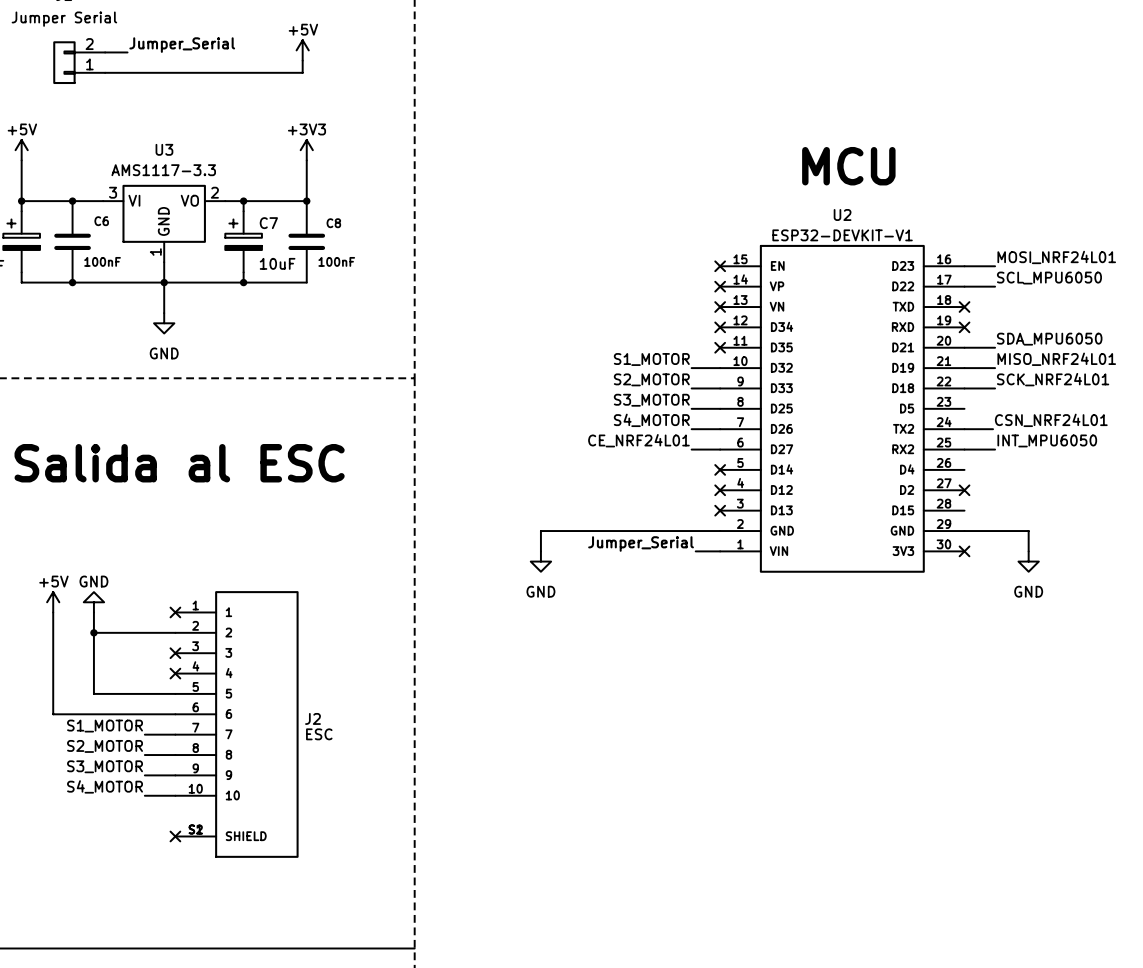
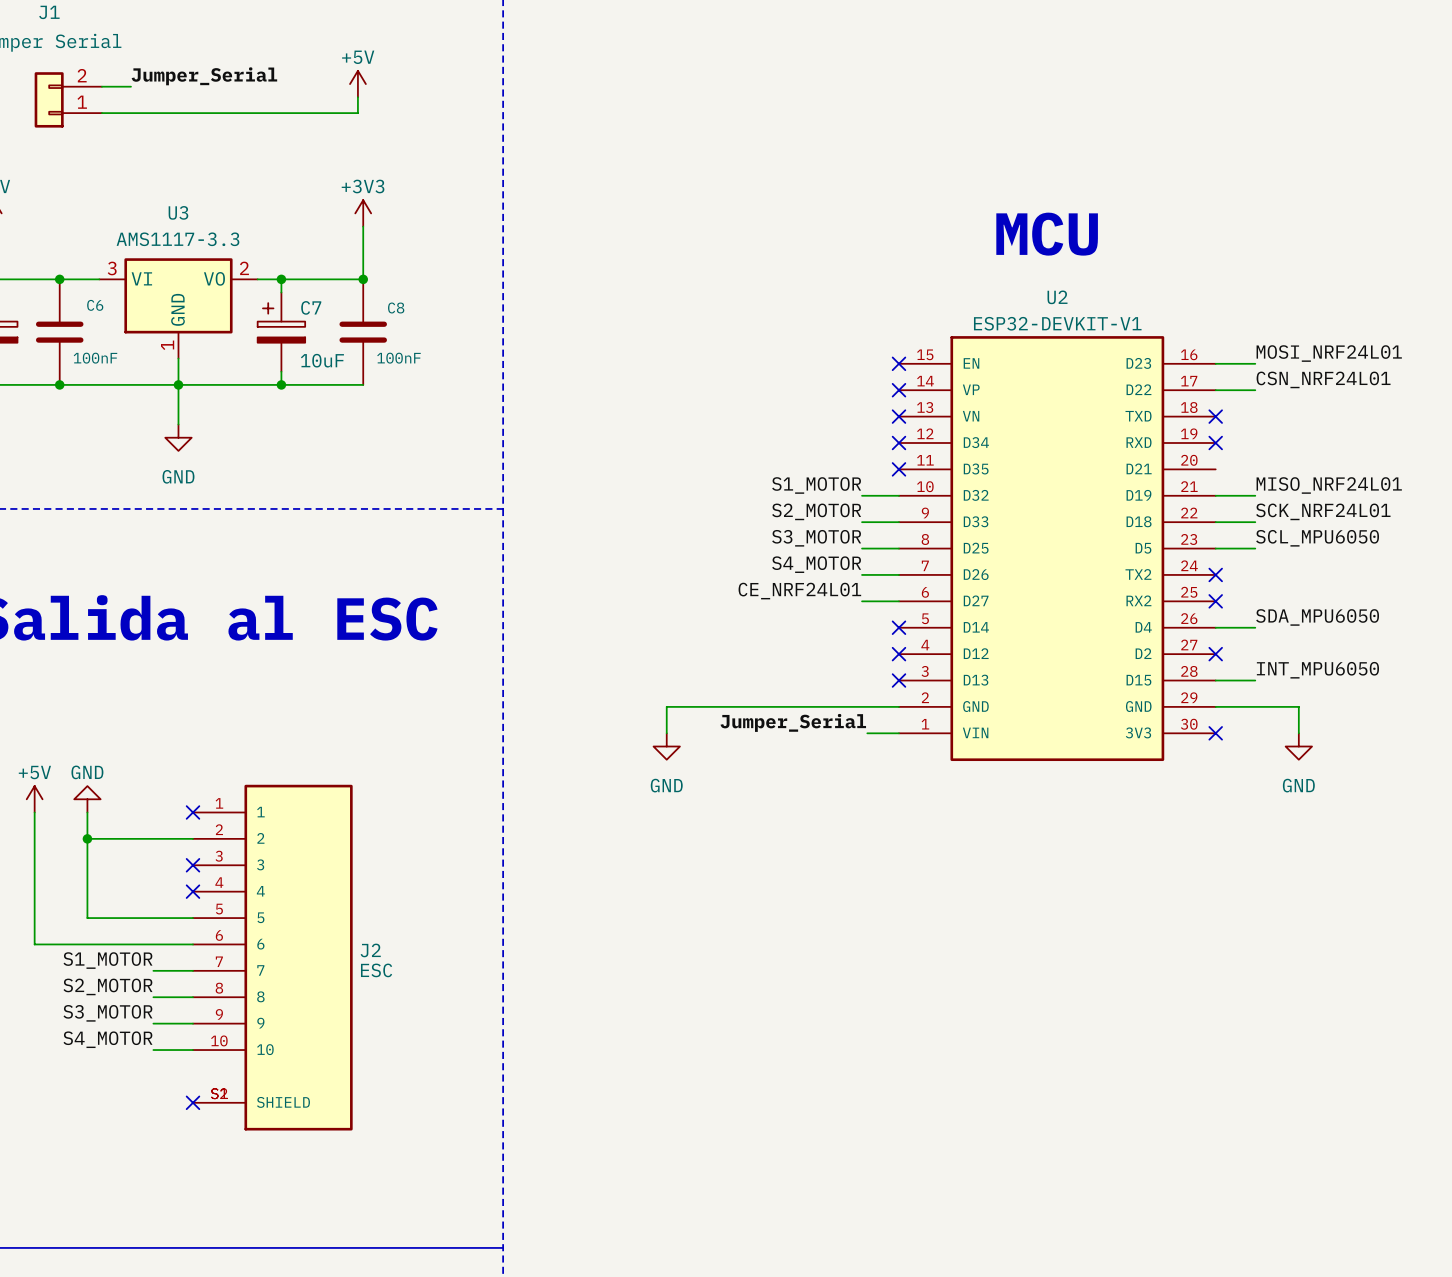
label: SCL_MPU6050 (1049, 278) -> CSN_NRF24L01 (1323, 379)
label position: SDA_MPU6050 (1049, 339) -> SDA_MPU6050 (1317, 617)
wire: (964, 347) (995, 347) -> (1215, 548) (1255, 548)
label: none -> SCL_MPU6050 (1317, 538)
label: CSN_NRF24L01 (1051, 420) -> none
wire: (964, 429) (993, 429) -> none
no-connect mark: none -> (1215, 574)
label position: INT_MPU6050 (1047, 440) -> INT_MPU6050 (1317, 670)
wire: (964, 449) (995, 449) -> (1215, 680) (1255, 680)
no-connect mark: none -> (1215, 601)
wire: none -> (1215, 627) (1255, 627)

